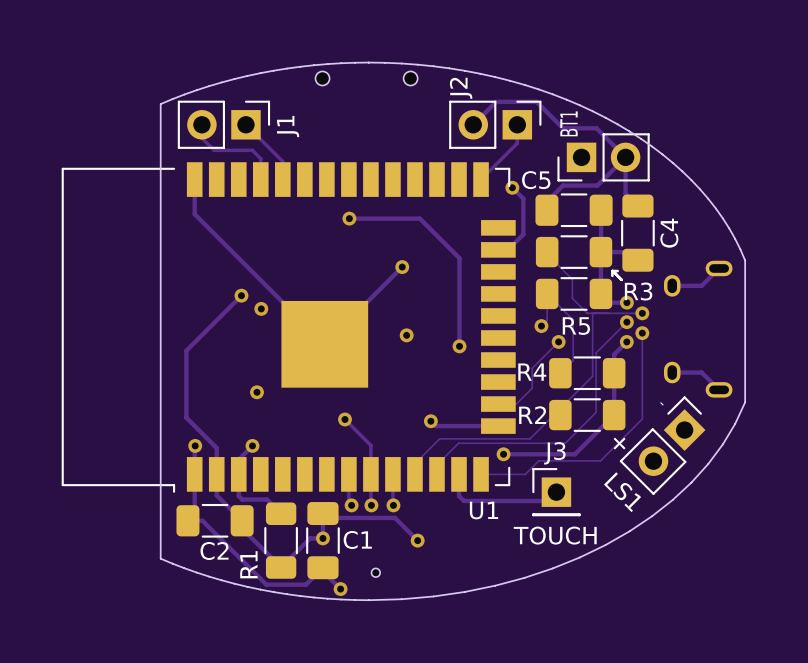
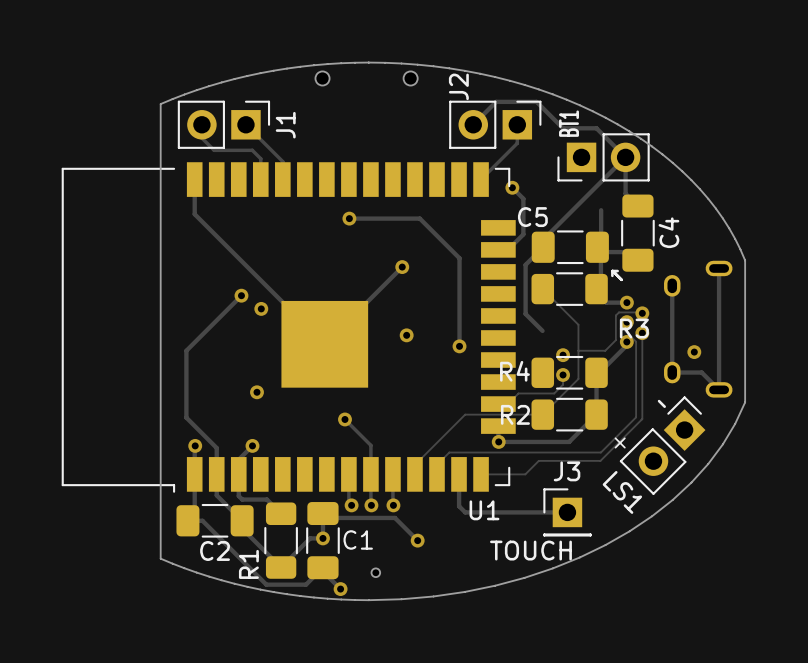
track: (597, 185) (563, 185) (546, 201) (546, 210) -> (597, 185) (543, 239) (543, 247) (525, 264) (525, 313) (542, 330)
C5 position: (574, 210) -> (570, 247)
track: (547, 252) (572, 279) (572, 298) (587, 313) (642, 313) -> none
R3 position: (574, 252) -> (569, 289)
track: (719, 268) (701, 285) (672, 285) -> (719, 268) (719, 389)
track: none -> (672, 285) (672, 372)
R5: (574, 293) -> none
track: none -> (639, 312) (618, 312) (615, 315) (615, 340) (605, 350) (578, 350)
track: (592, 313) (592, 376) (560, 408) (560, 415) (553, 415) (530, 438) (439, 438) (414, 464) -> (542, 289) (578, 324) (578, 378) (542, 414) (465, 414) (414, 464)
track: (626, 322) (596, 352) (596, 412) (565, 443) (458, 443) (449, 452) -> (625, 324) (625, 331) (636, 341) (636, 417) (600, 452) (449, 452)
track: (541, 326) (547, 320) (547, 293) (573, 319) (573, 360) (560, 373) -> none
via: (541, 326) -> none
track: (558, 341) (532, 368) (532, 388) (516, 404) (507, 404) -> (563, 374) (563, 384) (554, 393) (518, 393) (507, 404)
via position: (558, 341) -> (563, 355)
track: (626, 341) (614, 354) (614, 415) (574, 454) (503, 454) -> none
via: none -> (694, 352)
R4 position: (587, 373) -> (569, 372)
via: none -> (563, 374)
R2 position: (587, 415) -> (569, 414)
track: (430, 421) (435, 426) (498, 426) -> (626, 345) (599, 372) (596, 372) (596, 414) (569, 441) (498, 441) (498, 426)
via: (430, 421) -> none
via position: (503, 454) -> (498, 441)
track: (459, 483) (459, 496) (463, 500) (547, 500) (556, 492) -> (459, 483) (459, 506) (465, 512) (567, 512)
J3 position: (556, 492) -> (567, 512)
J3 value position: TOUCH (555, 535) -> TOUCH (530, 550)

